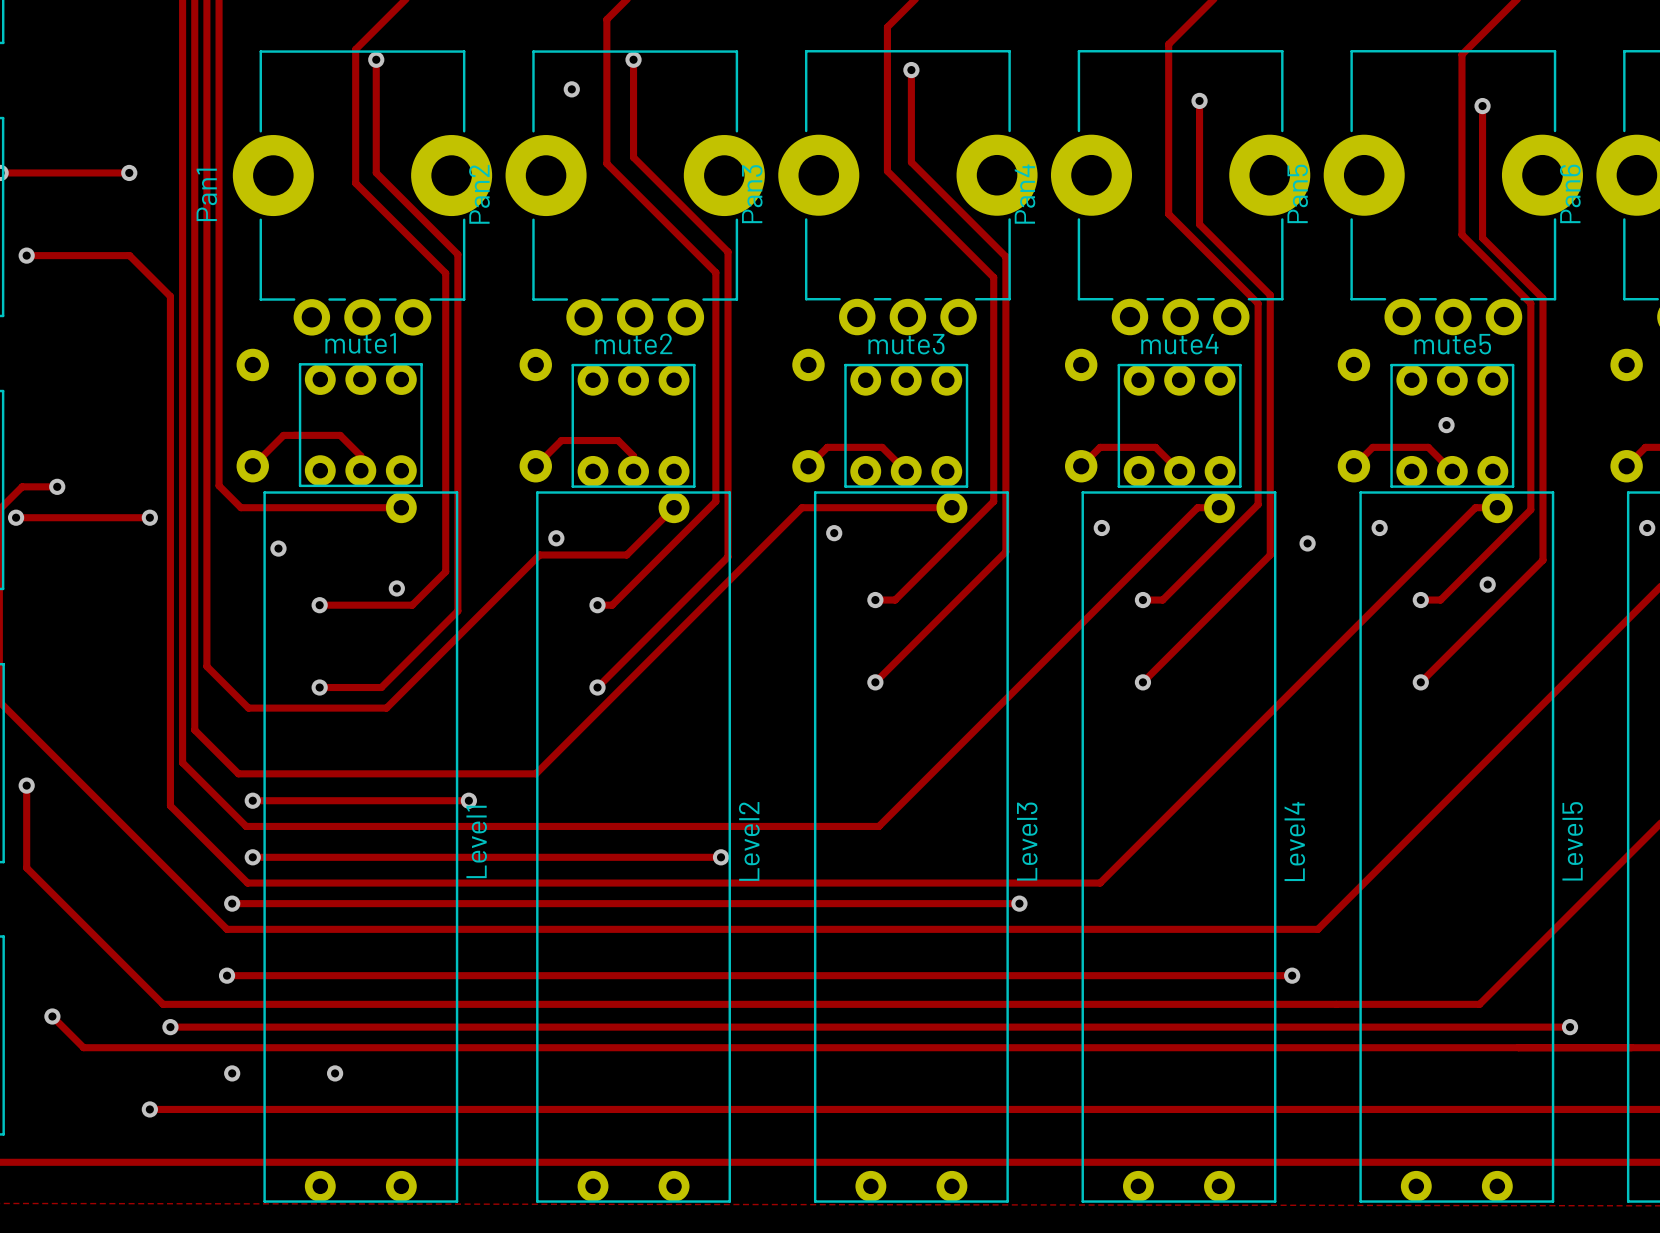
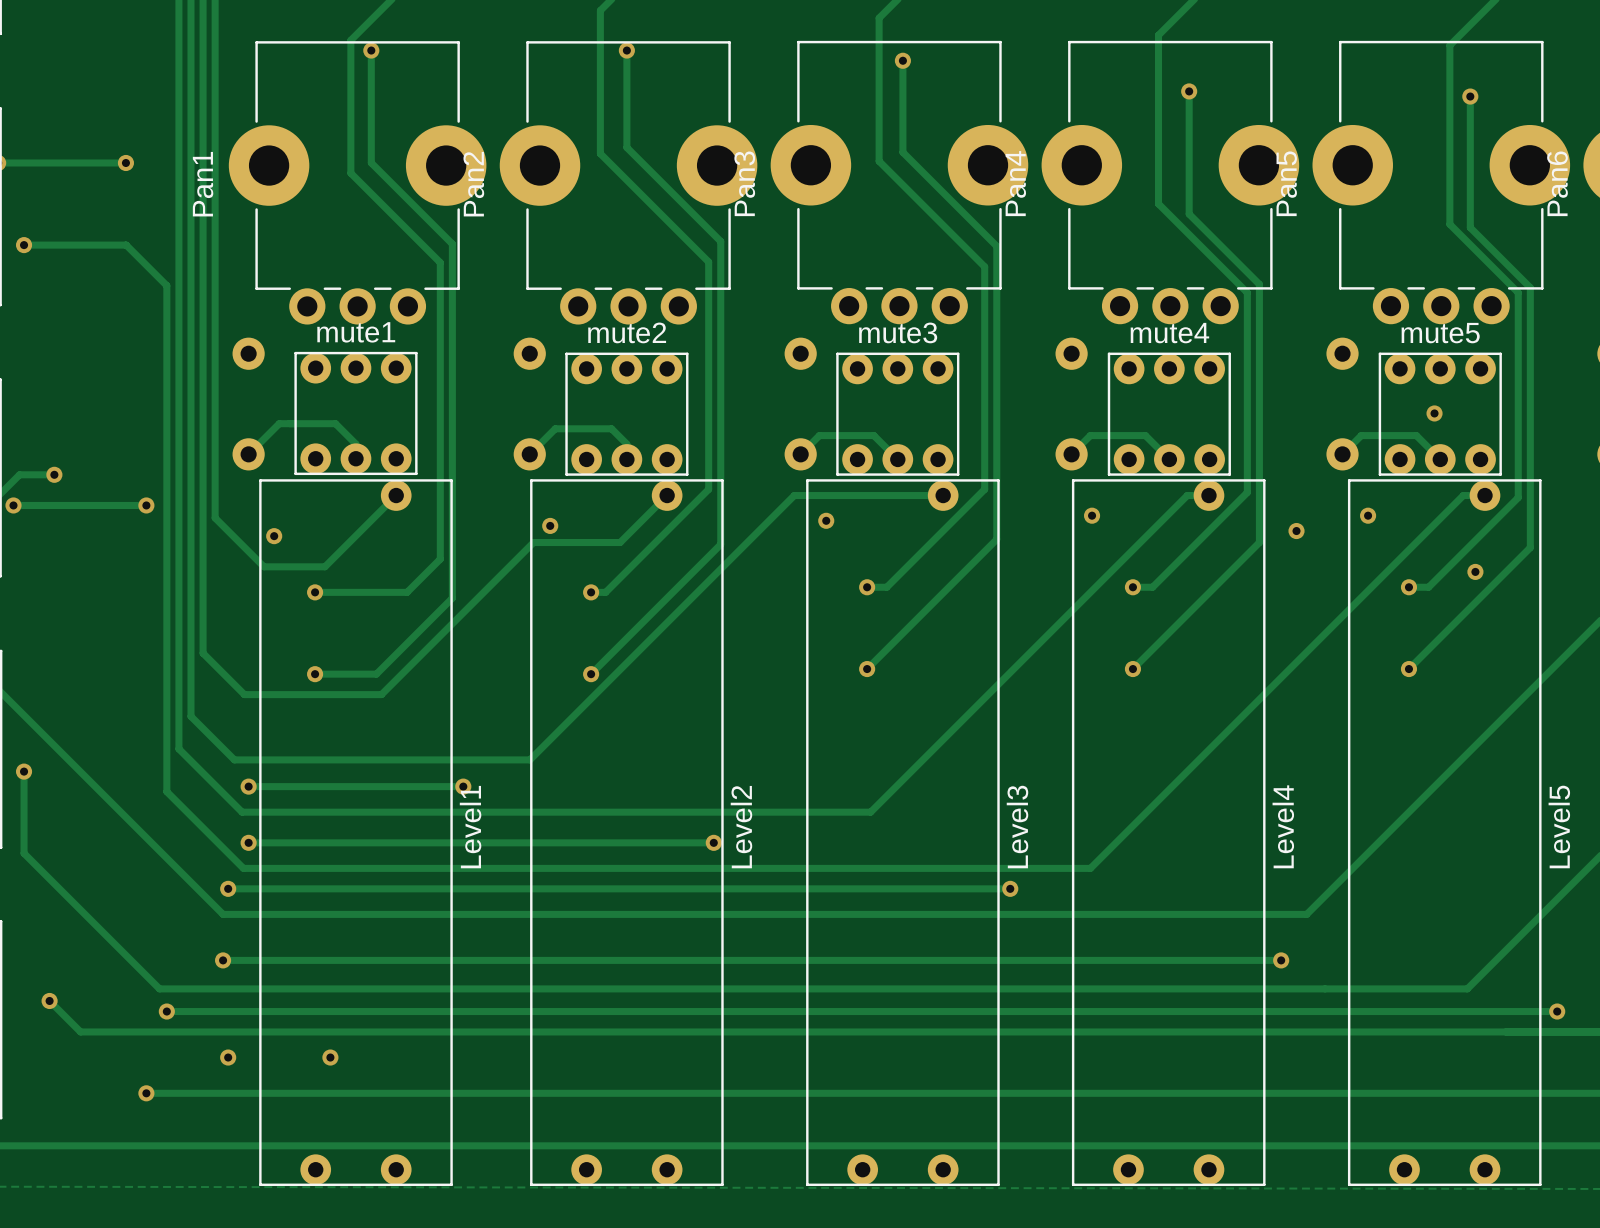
via: (571, 89) -> none
track: (219, 485) (240, 507) (401, 507) -> (215, 473) (215, 517) (263, 566) (324, 566) (396, 495)
via: (396, 588) -> none

